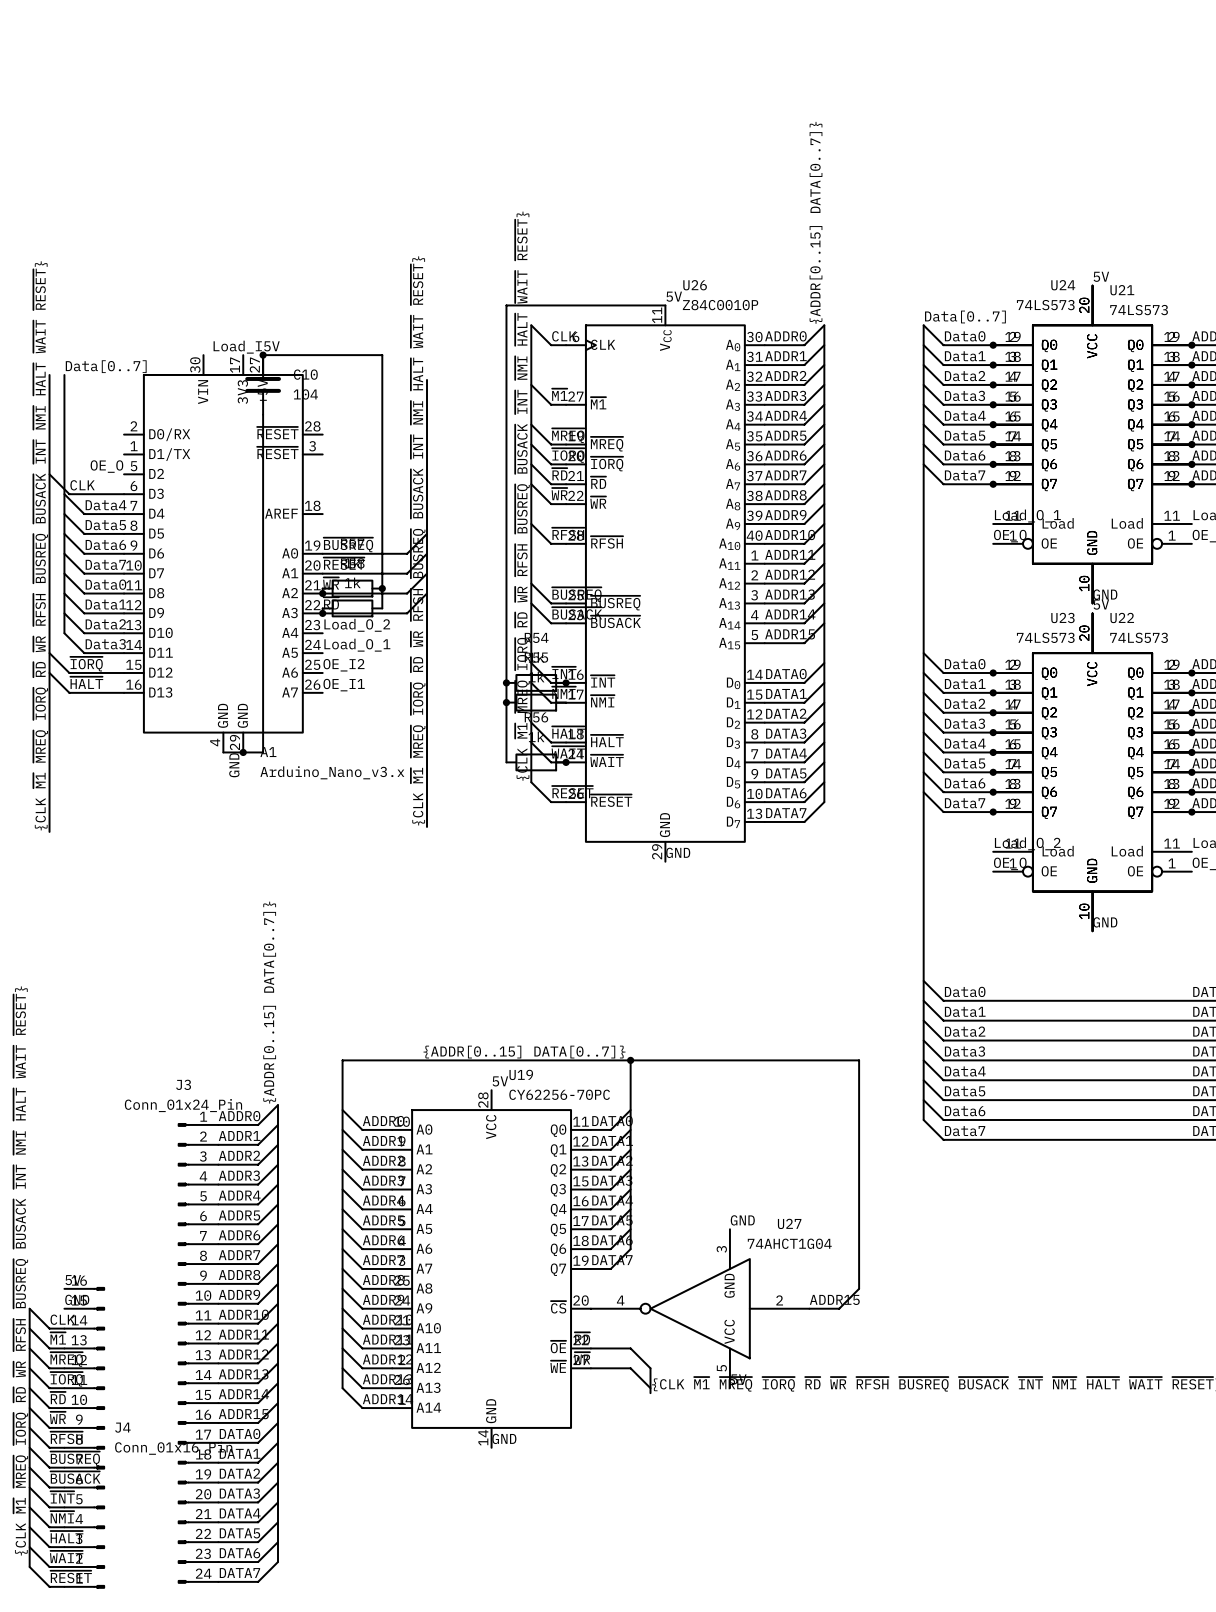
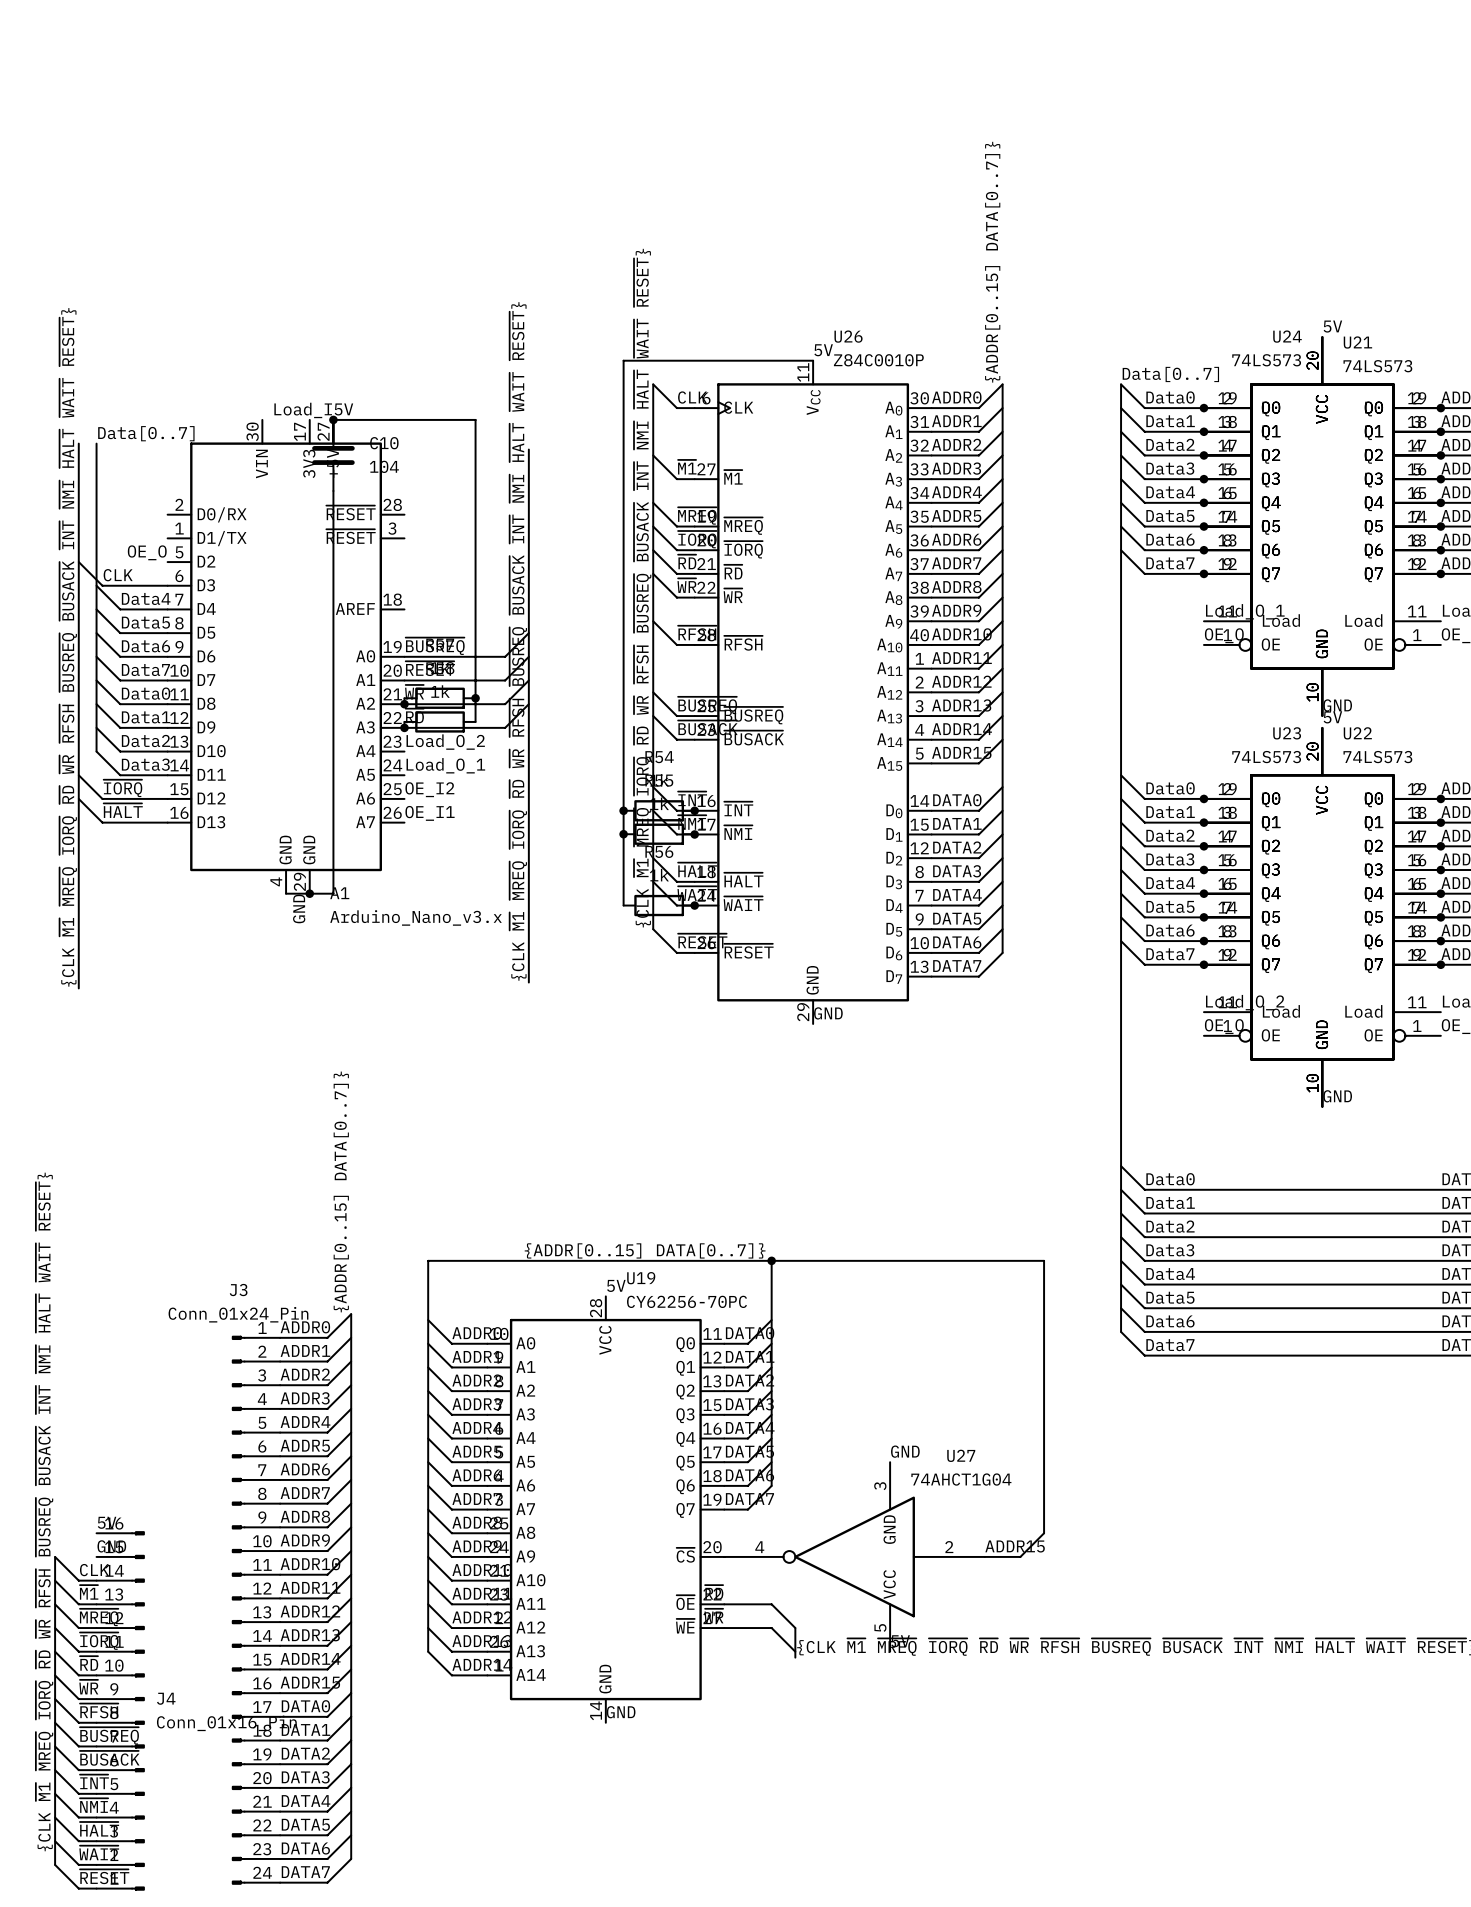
junction: none -> (694, 834)

